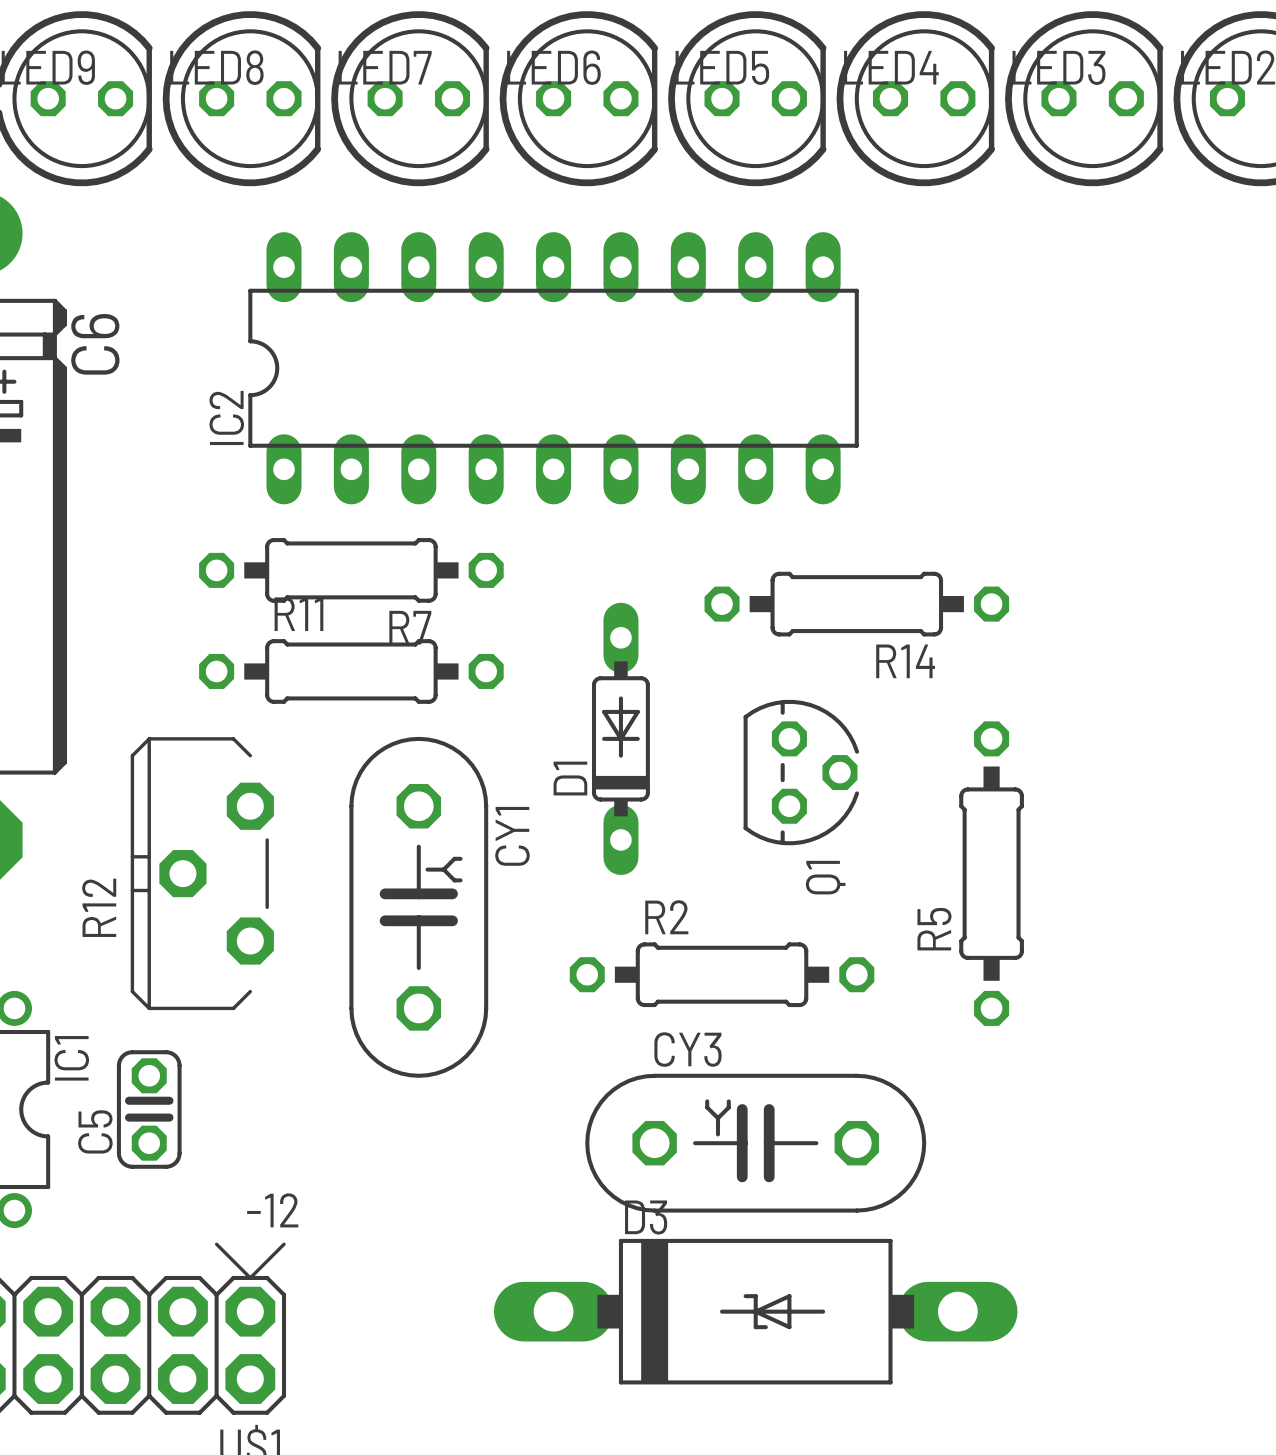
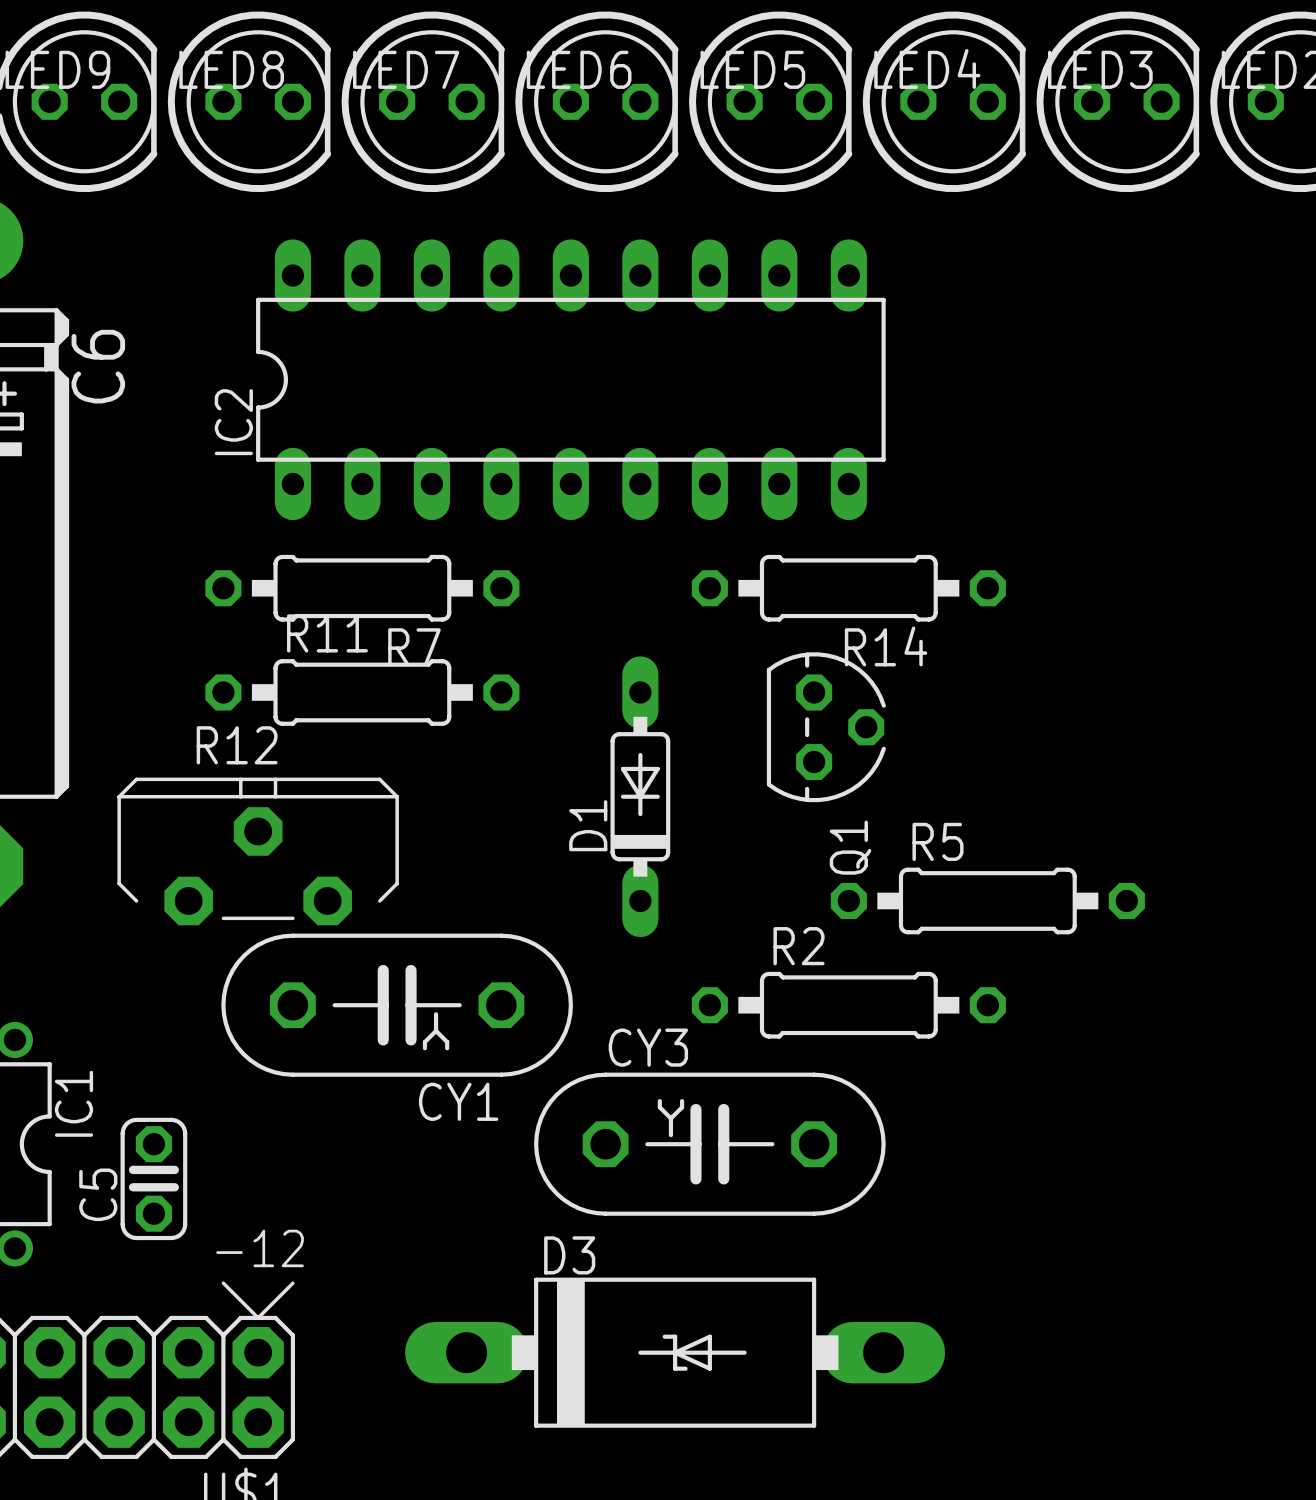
R14 position: (856, 604) -> (848, 588)
D1 position: (620, 738) -> (640, 796)
Q1 position: (801, 772) -> (826, 727)
R12 rotation: 0° (202, 873) -> 90° clockwise (258, 851)
R5 rotation: 0° (991, 873) -> 90° clockwise (987, 900)
CY1 rotation: 0° (418, 907) -> 90° clockwise (397, 1005)
R2 position: (722, 974) -> (848, 1005)
C5 position: (149, 1109) -> (153, 1178)
CY3 position: (755, 1143) -> (709, 1144)
D3 position: (755, 1311) -> (675, 1352)

